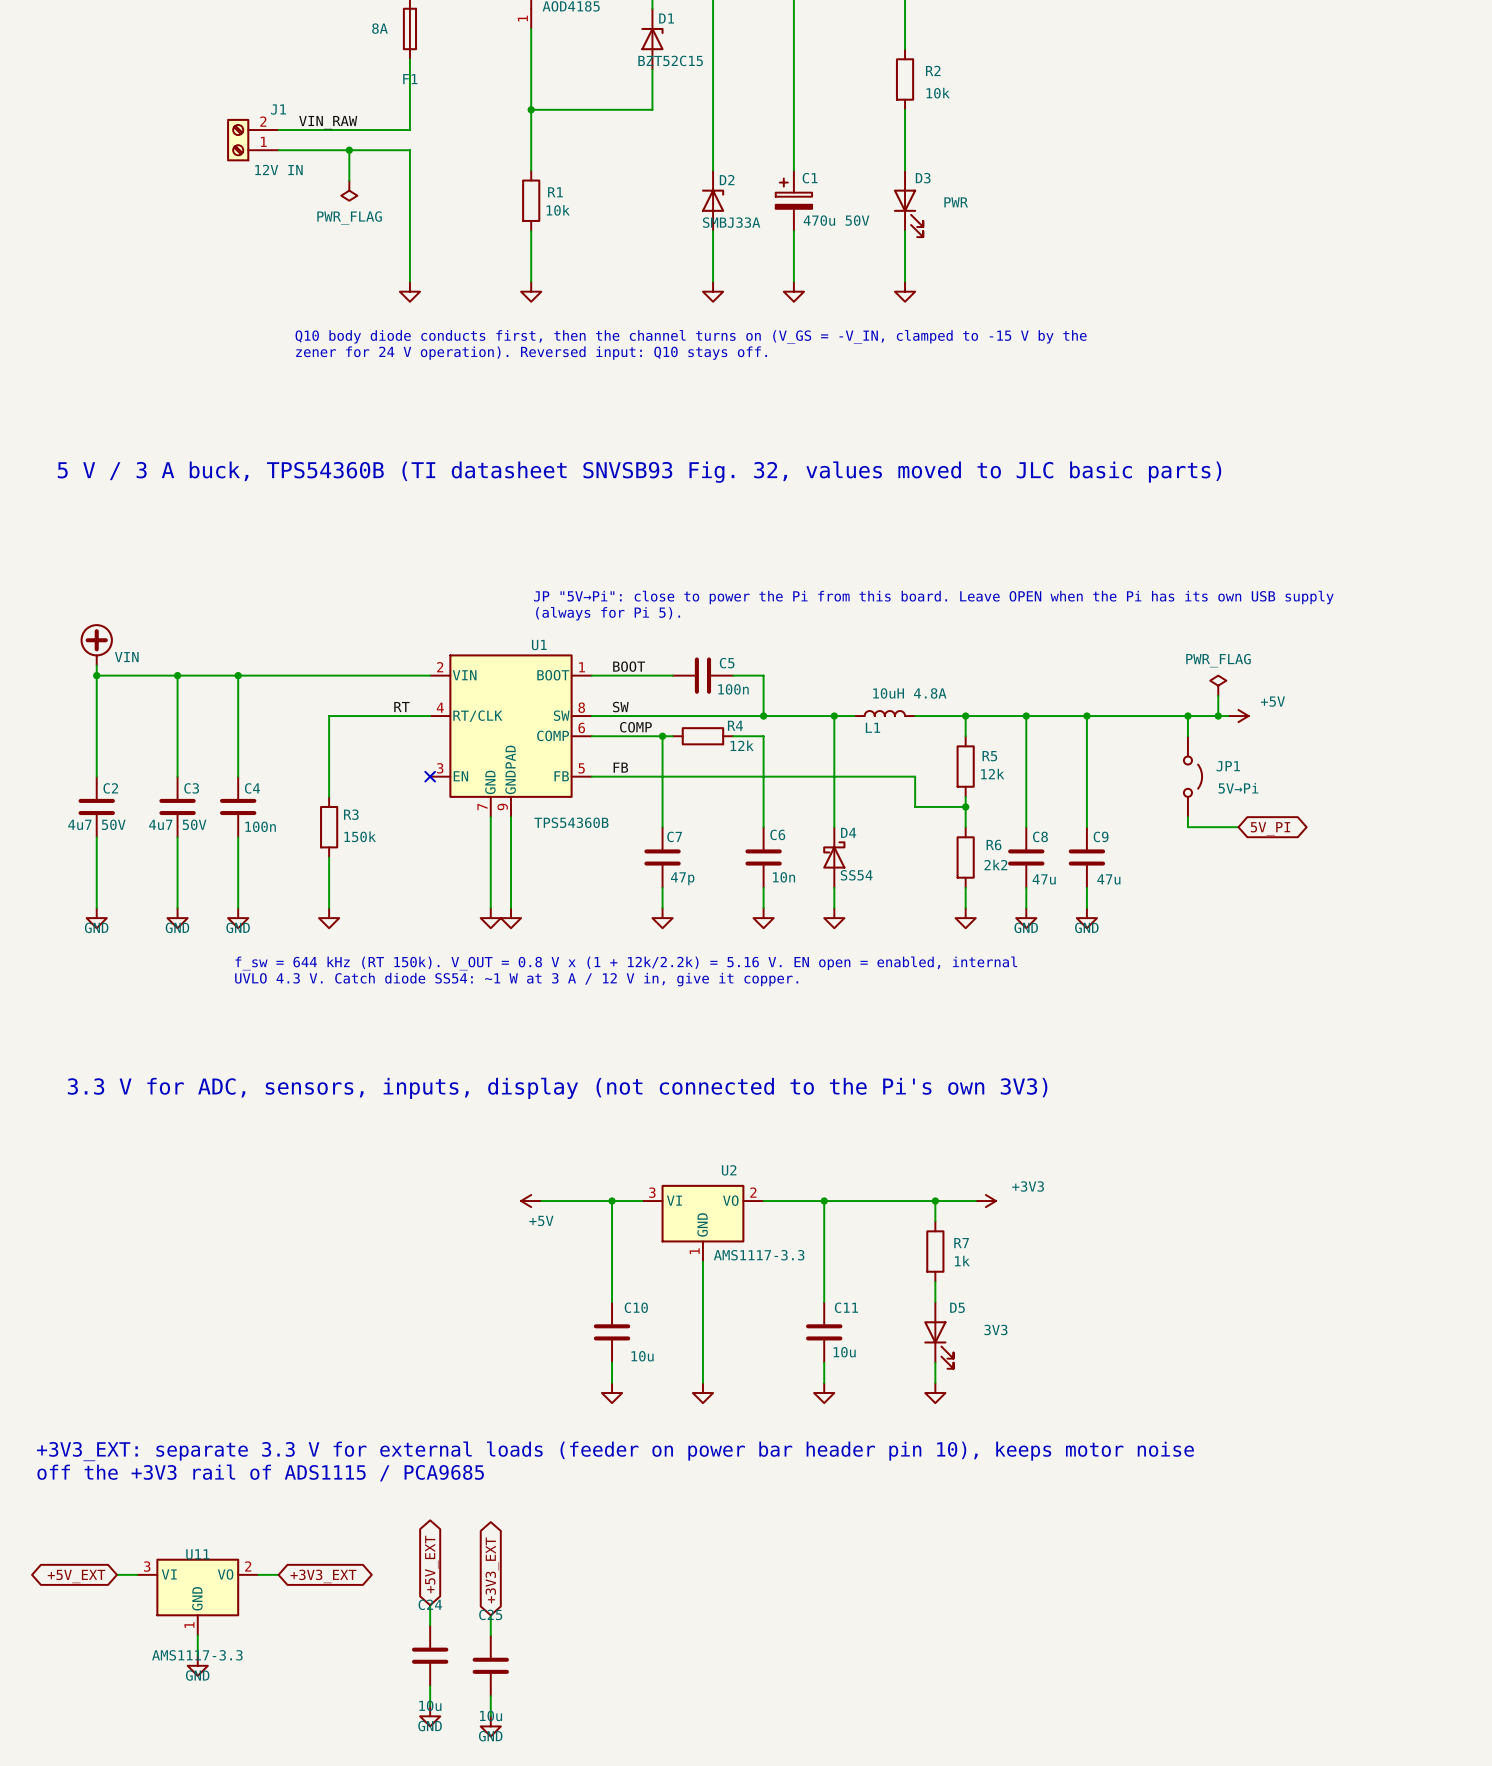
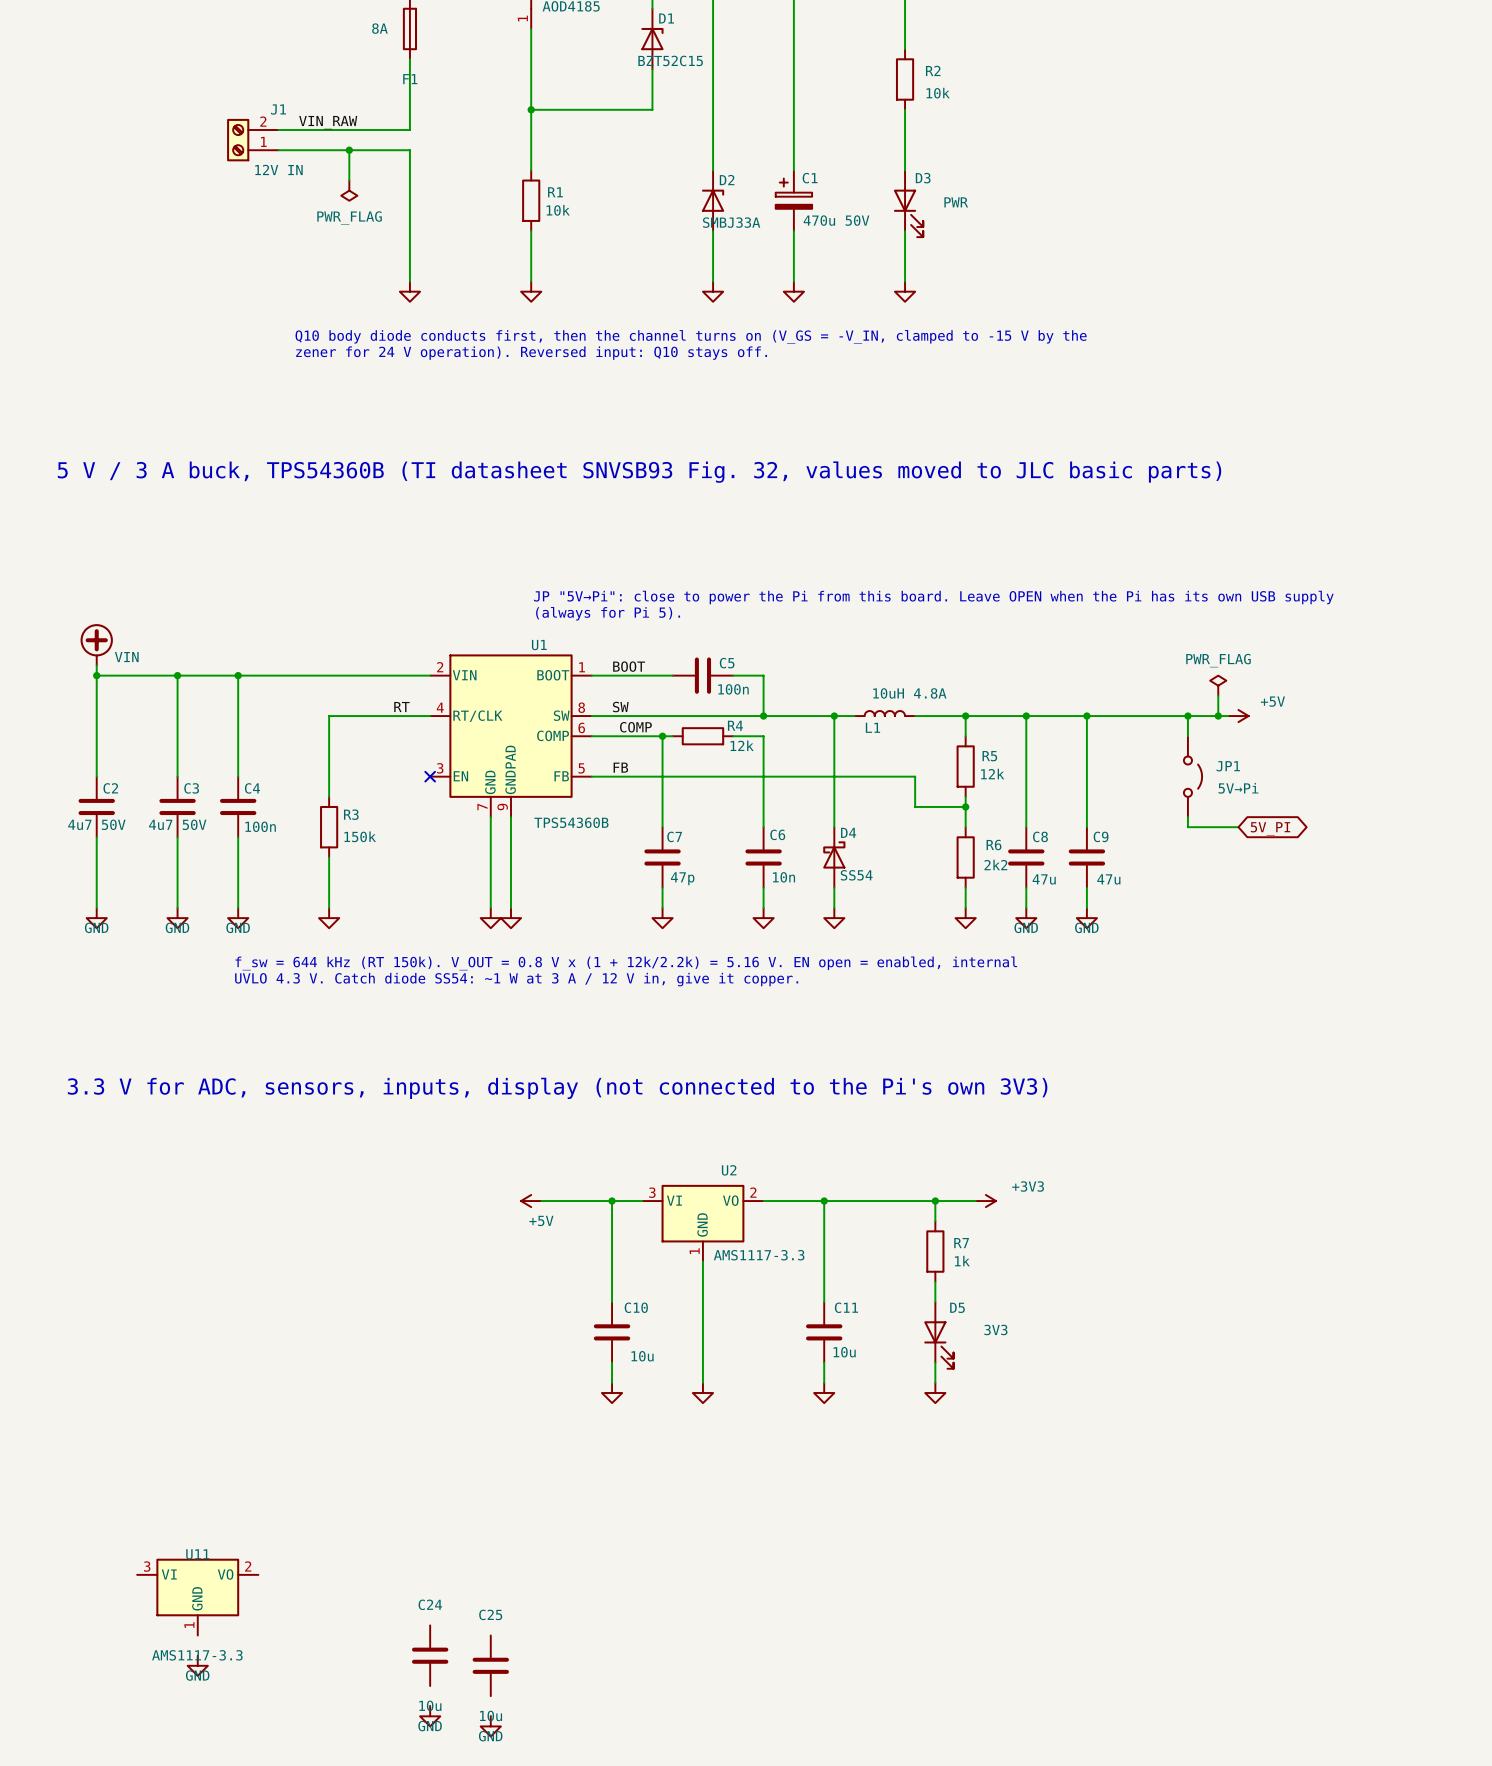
text: +3V3_EXT: separate 3.3 V for external loads (feeder on power bar header pin 10), keeps motor noise (615, 1451) -> none
text: off the +3V3 rail of ADS1115 / PCA9685 (260, 1472) -> none
global label: +5V_EXT (431, 1564) -> none
global label: +3V3_EXT (492, 1570) -> none
wire: (116, 1574) (137, 1574) -> none
wire: (258, 1574) (278, 1574) -> none
global label: +5V_EXT (76, 1576) -> none
global label: +3V3_EXT (323, 1576) -> none
wire: (430, 1605) (430, 1625) -> none
wire: (490, 1615) (490, 1635) -> none
wire: (197, 1635) (197, 1655) -> none
wire: (430, 1686) (430, 1706) -> none
wire: (490, 1696) (490, 1716) -> none

